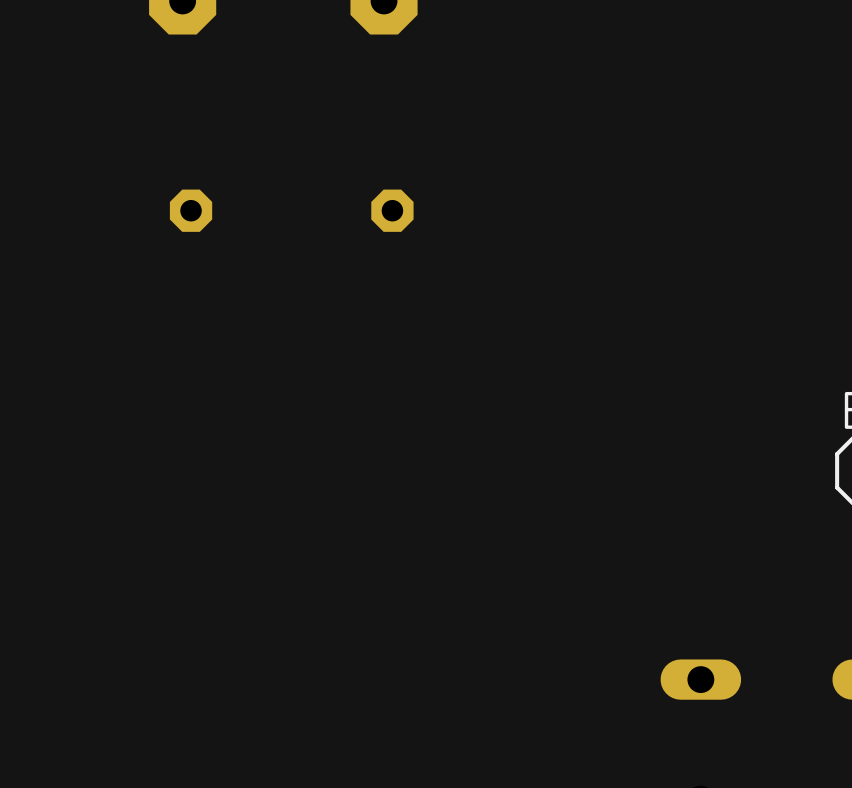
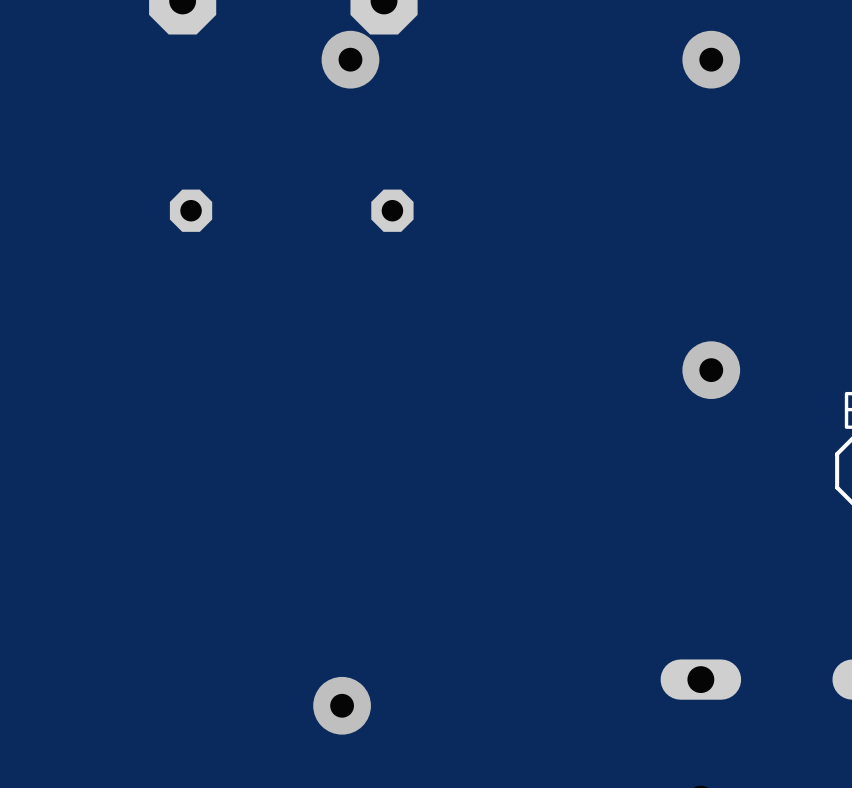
via: none -> (350, 59)
via: none -> (711, 59)
via: none -> (711, 370)
via: none -> (342, 705)

